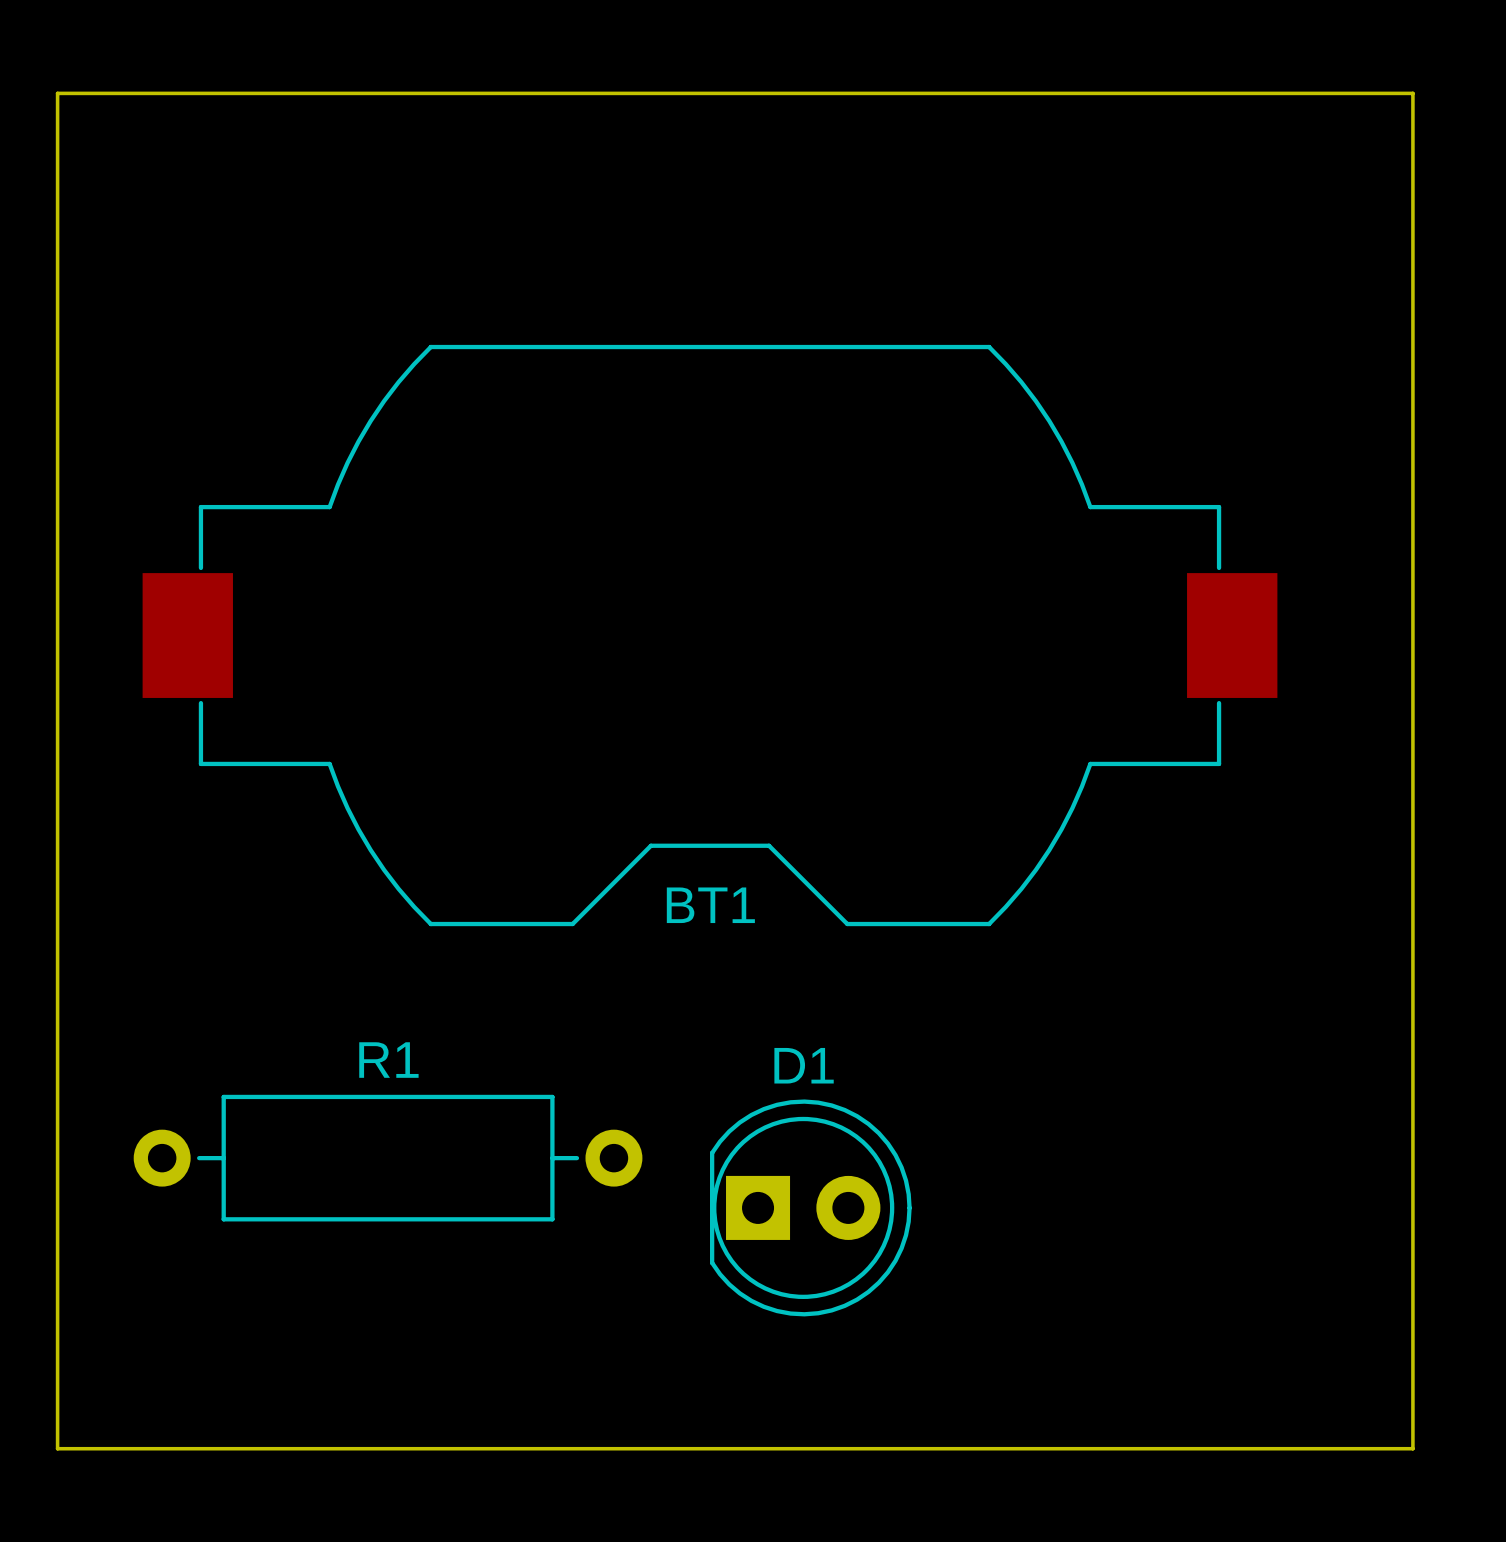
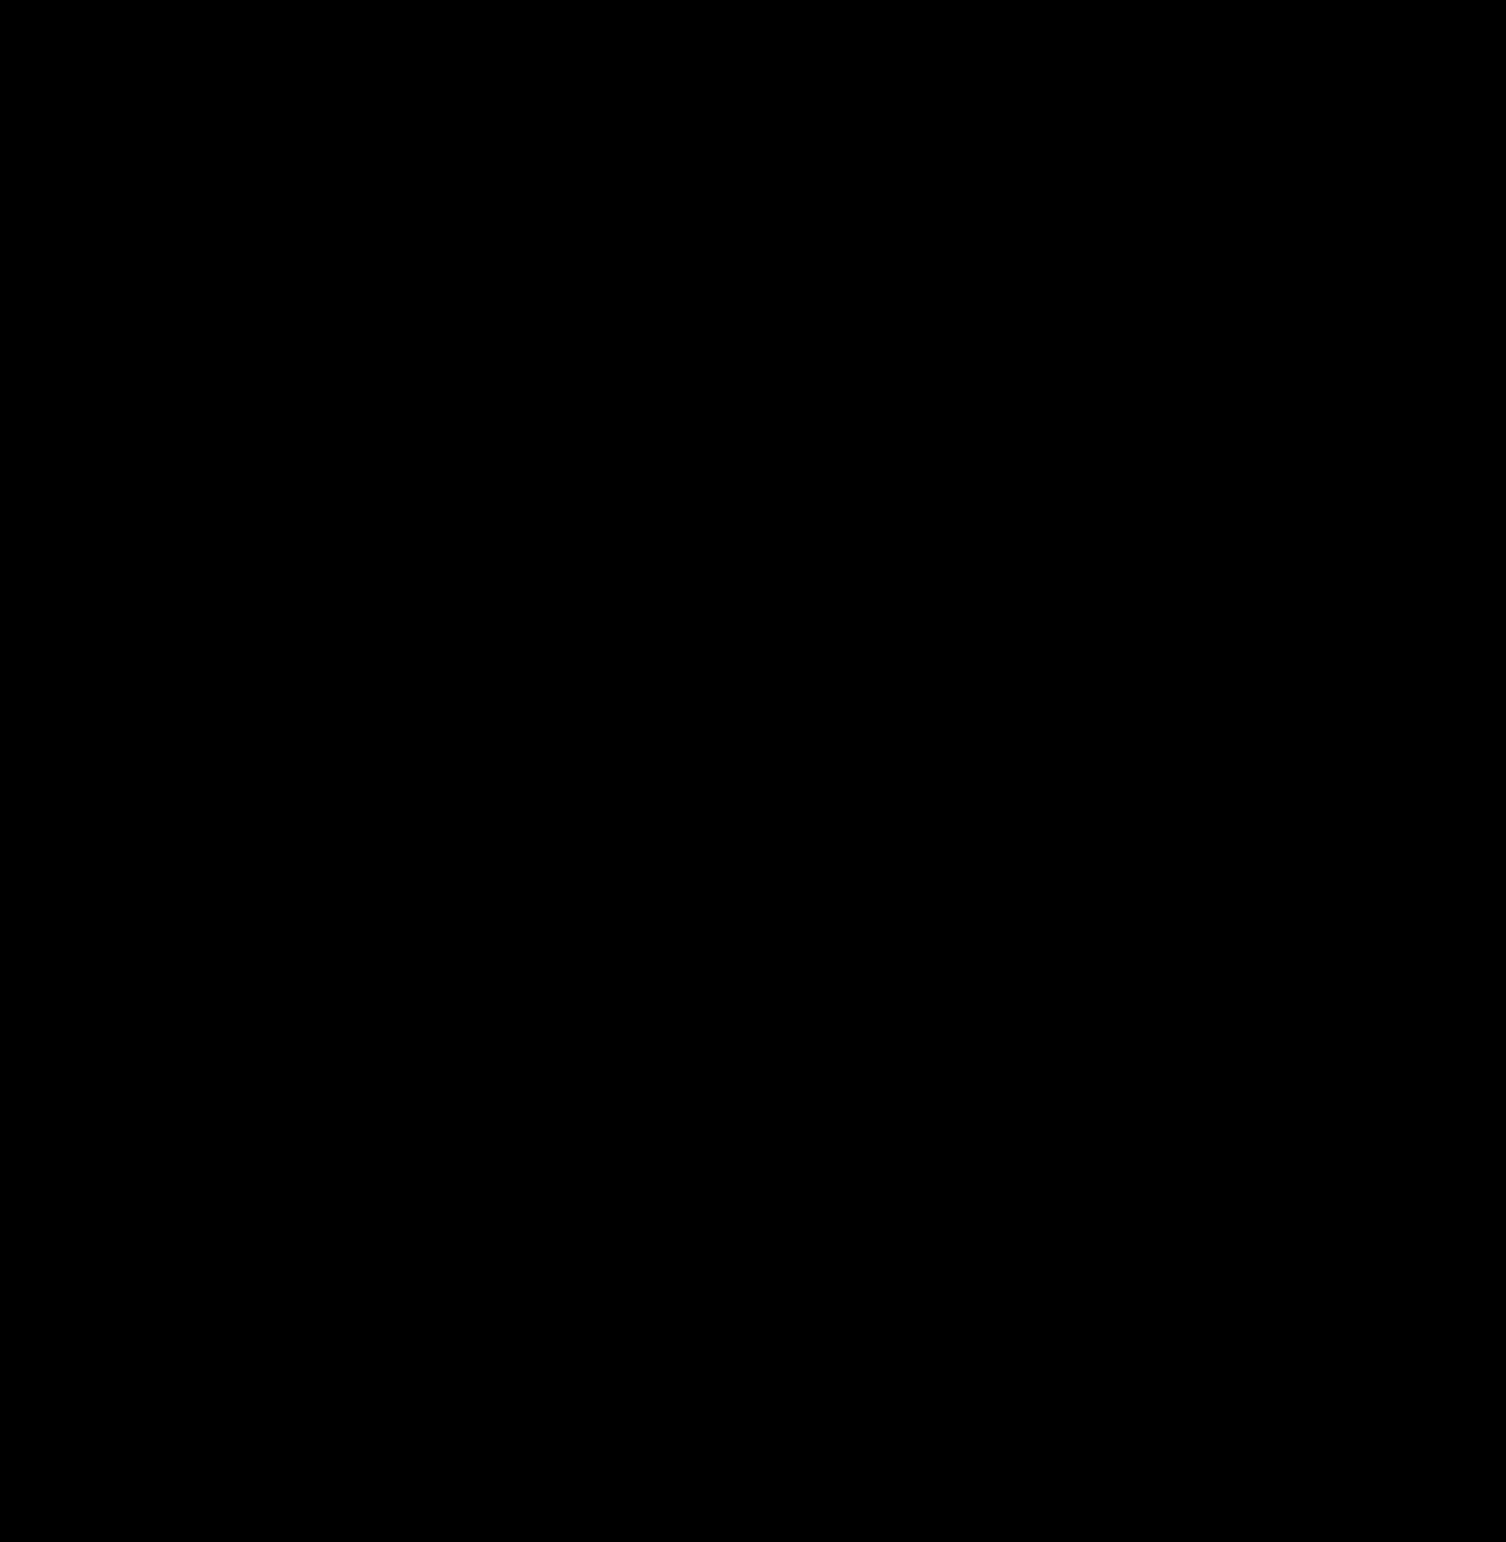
board edge: (57, 93) (1412, 93) (1412, 1448) (57, 1448) (57, 93) -> none
BT1: (710, 635) -> none
R1: (388, 1158) -> none
D1: (810, 1207) -> none

